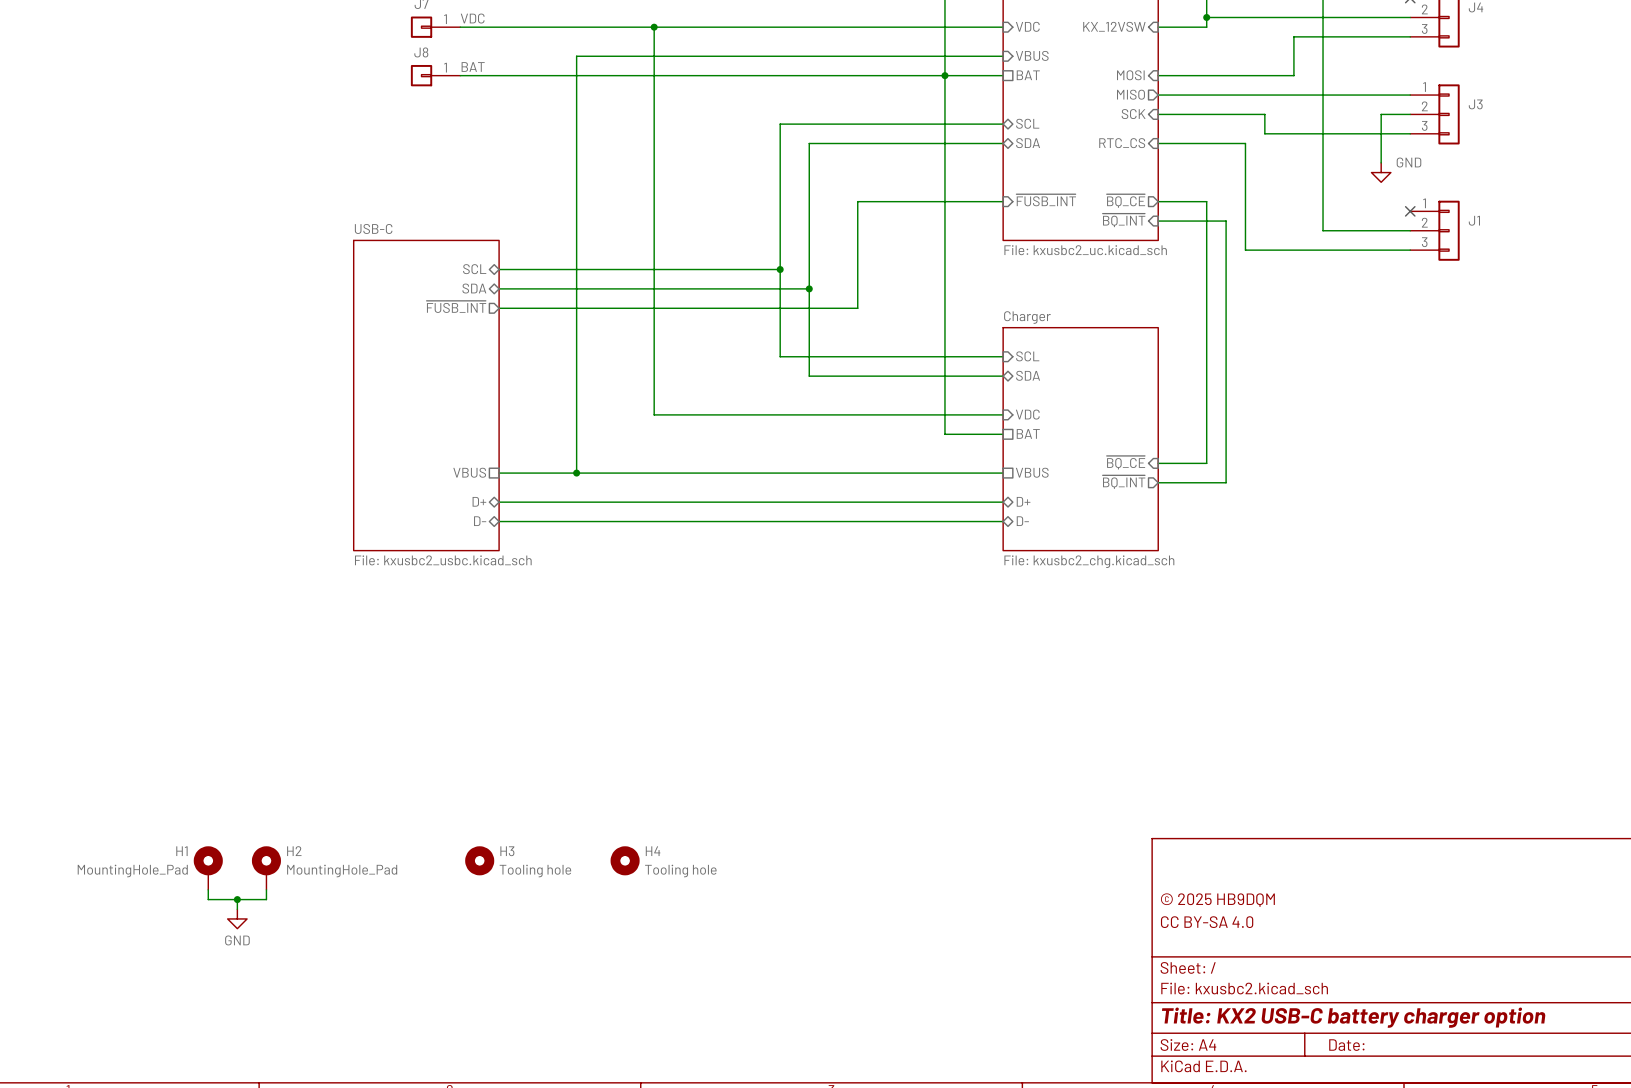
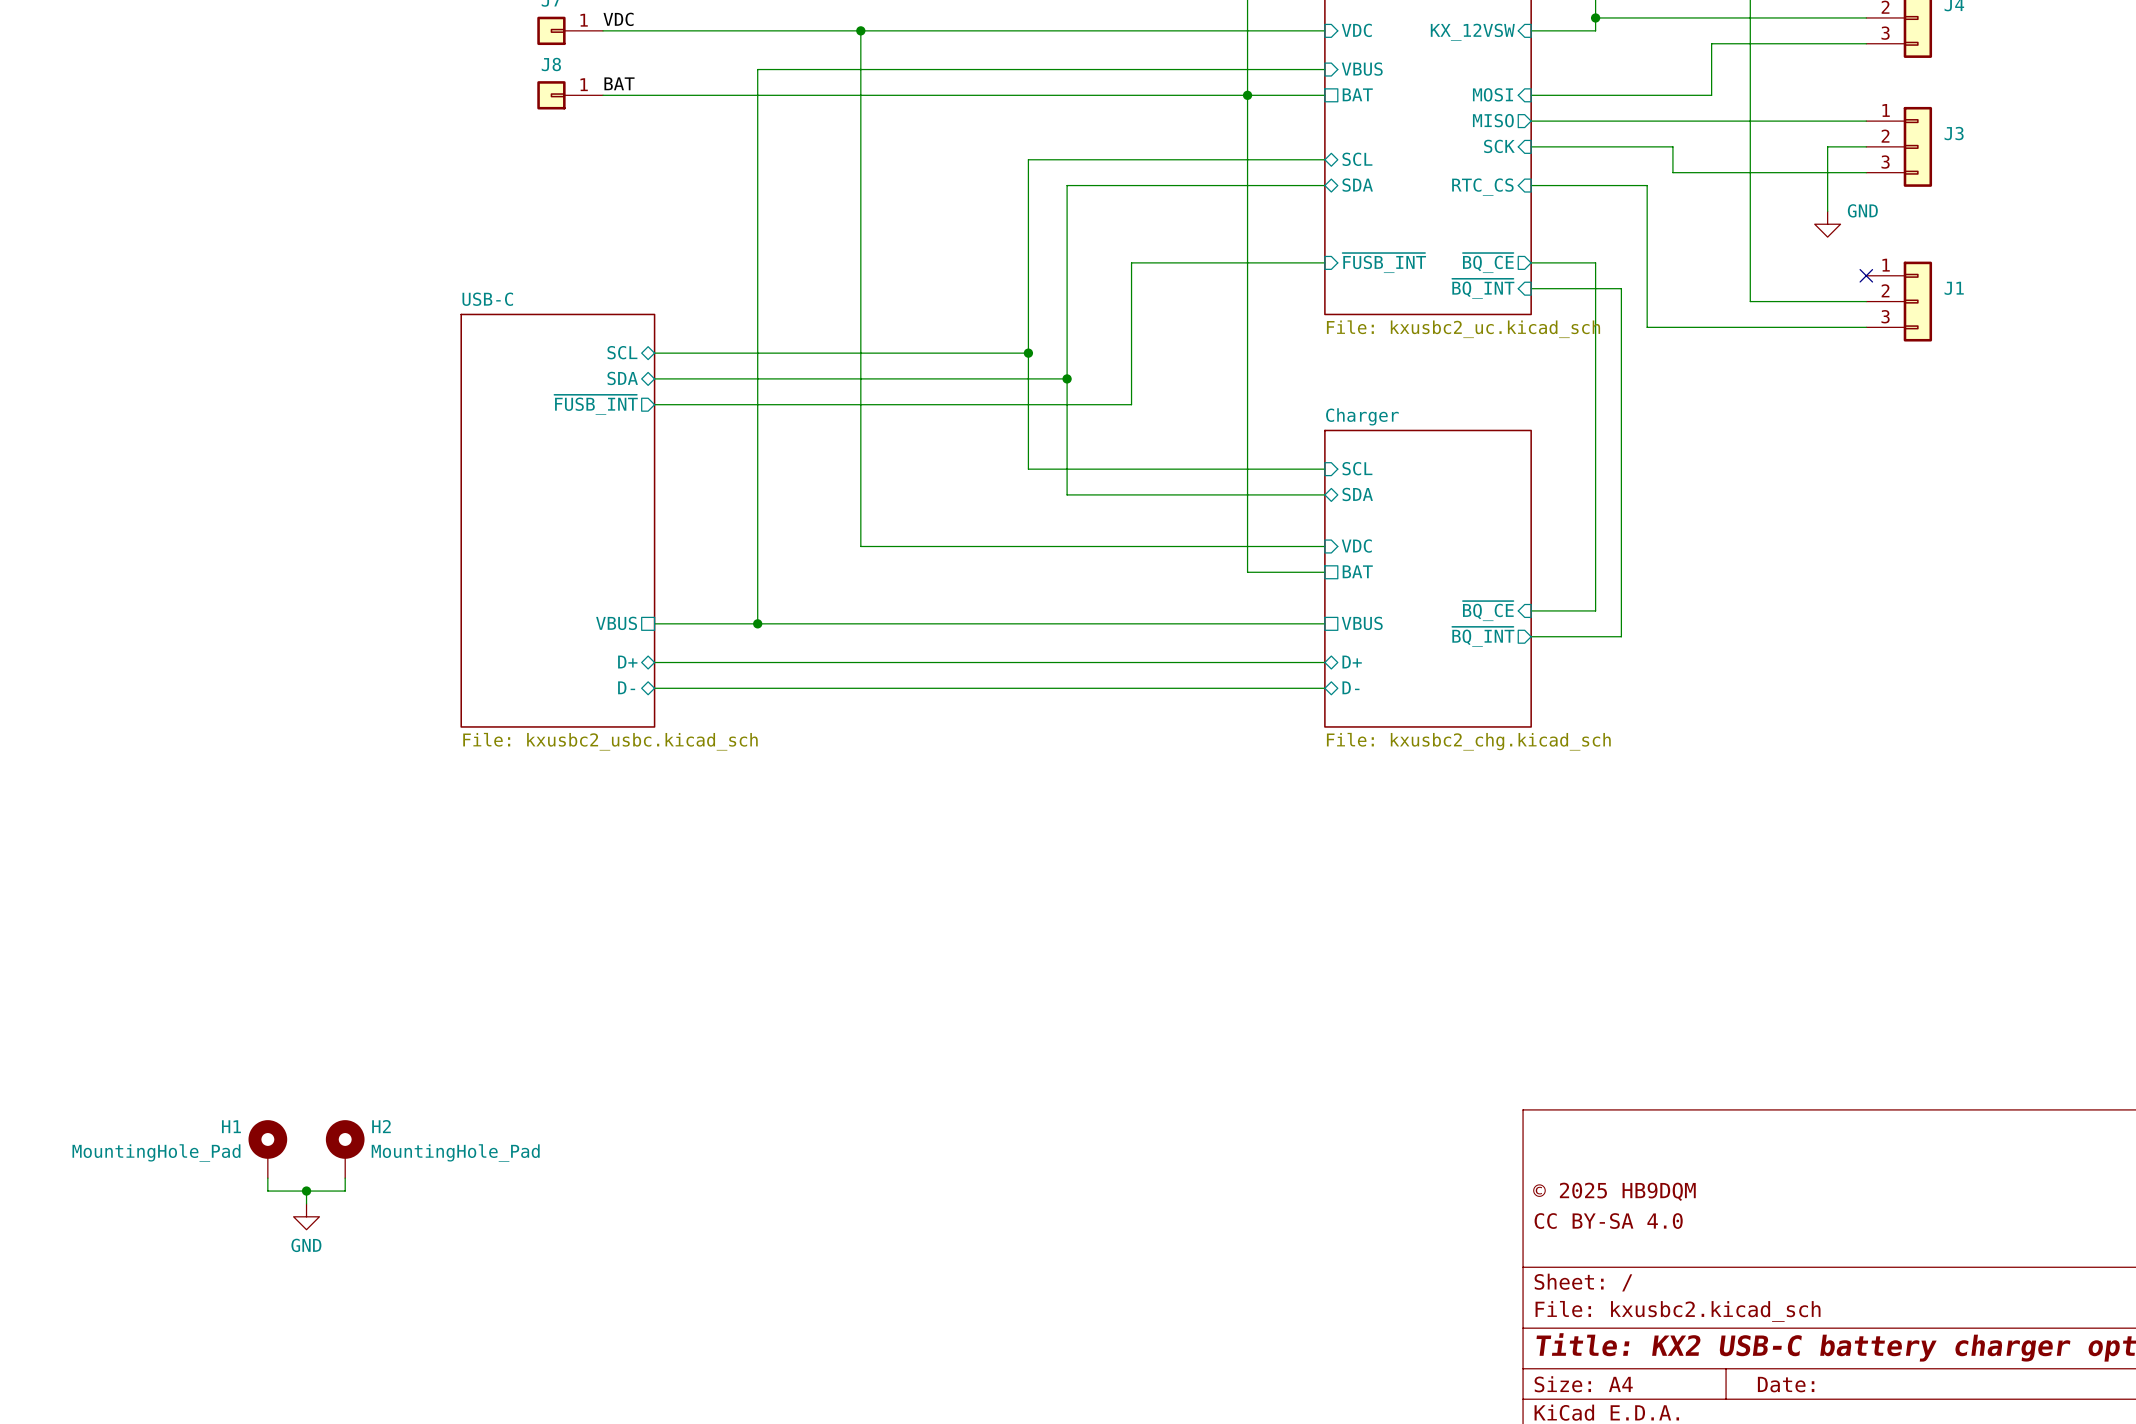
H3: Tooling hole (479, 860) -> none
H4: Tooling hole (625, 860) -> none

